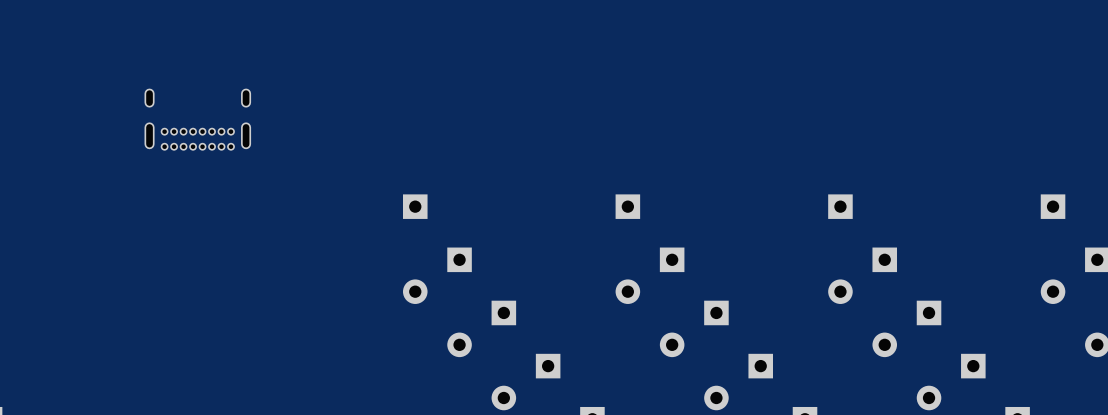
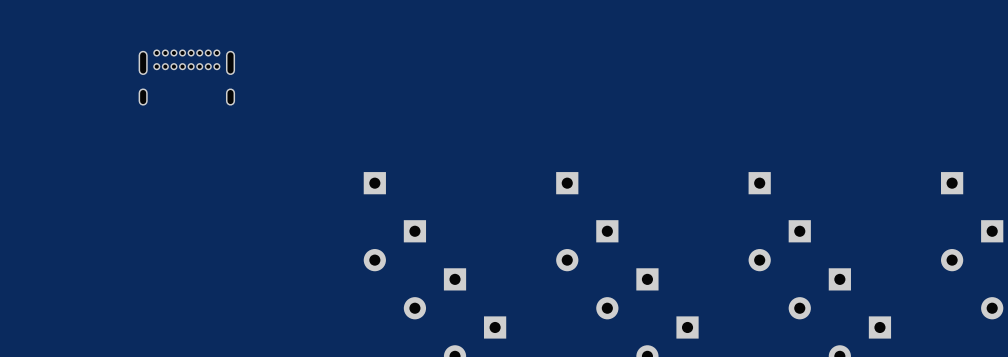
part rotation: 0° (197, 119) -> 180° (186, 77)

